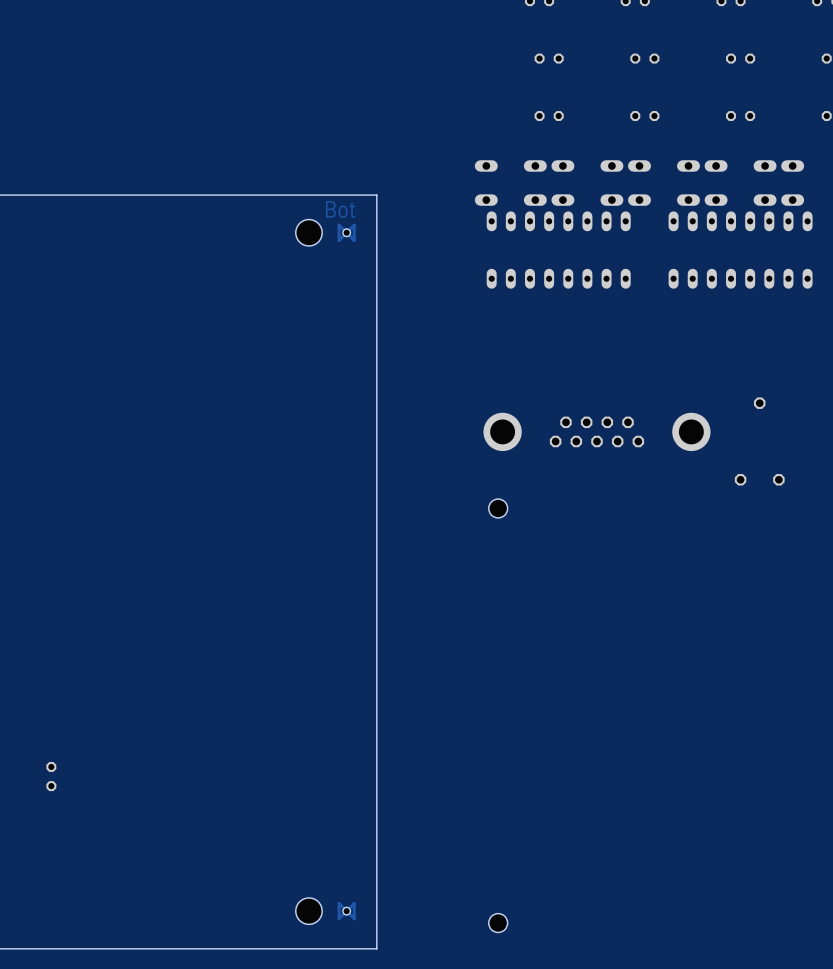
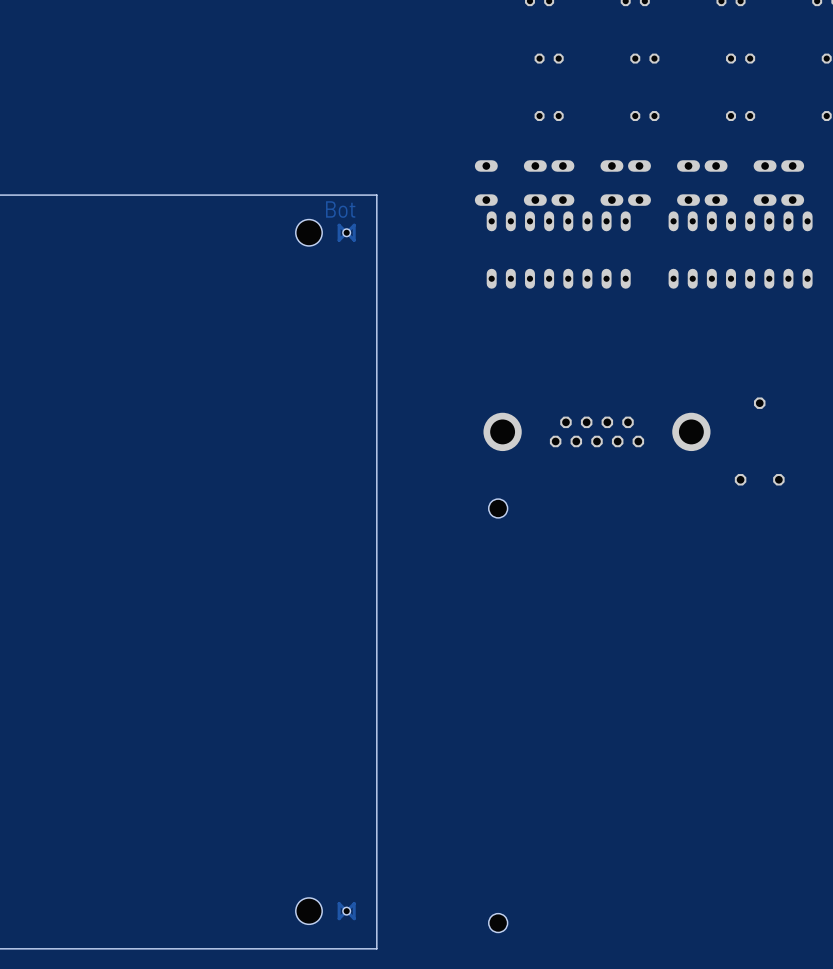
part: (51, 776) -> none

